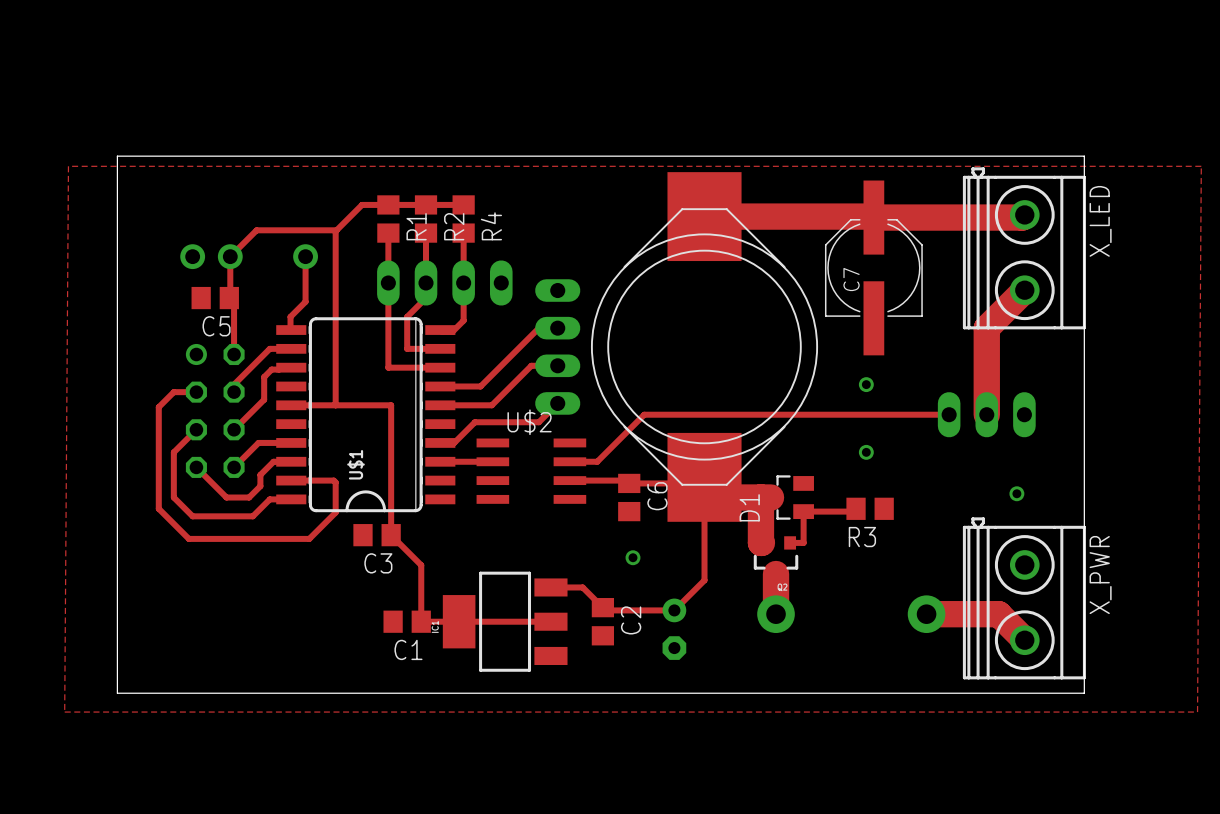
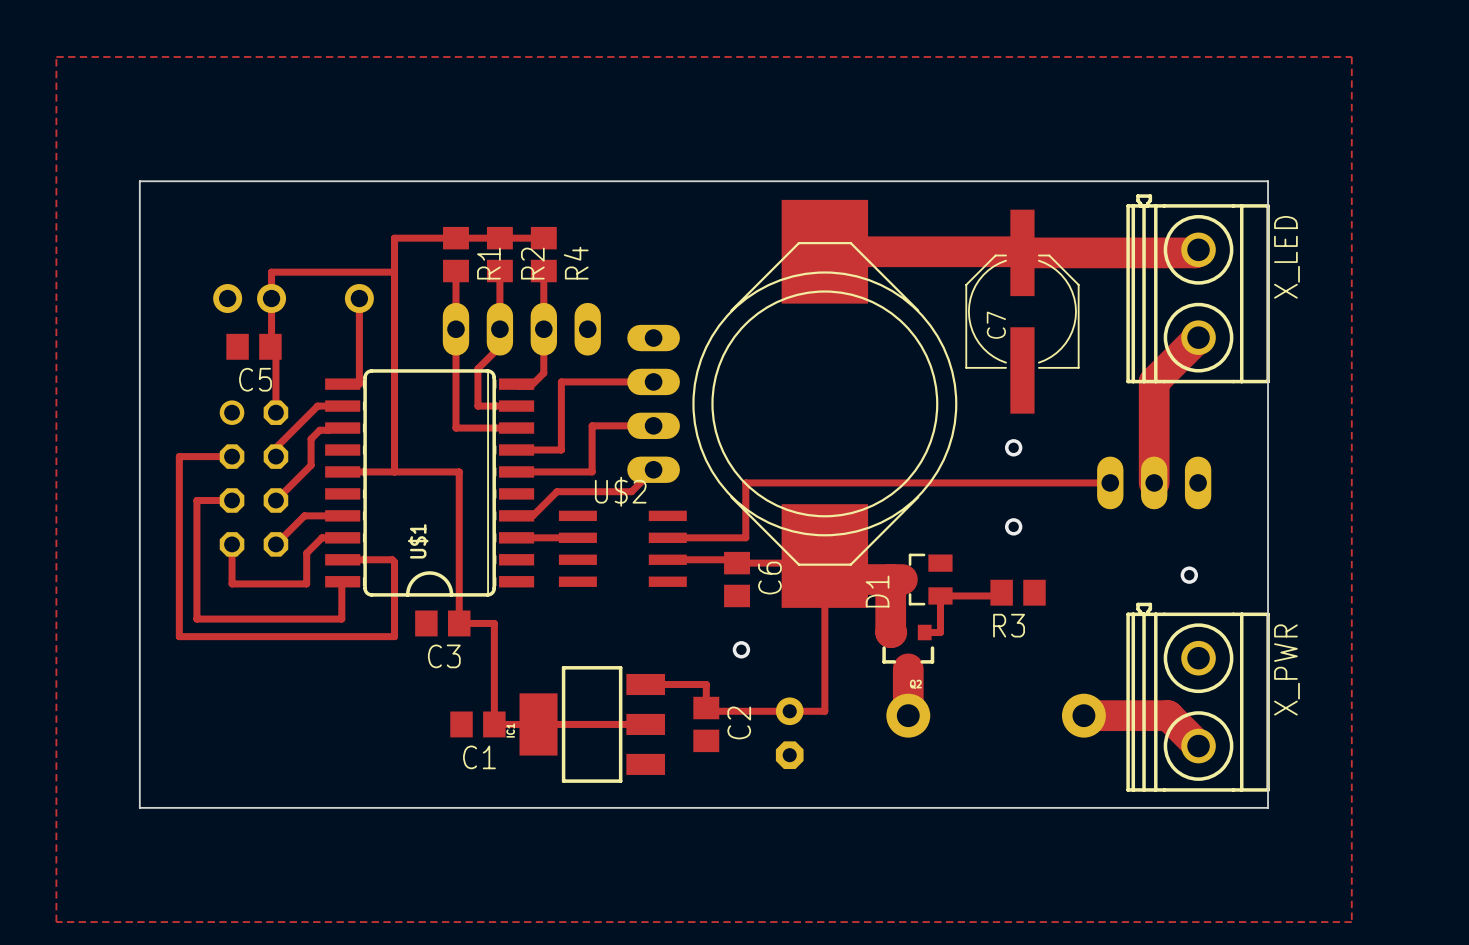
zone outline: (68, 166) (64, 712) (1197, 712) (1201, 166) (68, 166) -> (56, 56) (56, 922) (1351, 922) (1351, 56) (56, 56)
track: (362, 204) (335, 231) -> (425, 238) (394, 238) (394, 268)
track: (336, 230) (256, 230) (230, 256) -> (394, 272) (271, 272) (271, 298)
track: (305, 301) (290, 316) (291, 330) -> (359, 351) (359, 384) (342, 384)
track: (538, 328) (478, 386) -> (631, 381) (561, 381) (561, 450)
track: (531, 365) (491, 405) -> (622, 425) (592, 425) (592, 471) (576, 471)
track: (173, 392) (158, 407) (158, 508) (188, 538) (309, 538) (335, 512) -> (205, 456) (179, 456) (179, 636) (394, 636) (394, 597)
track: (644, 414) (597, 461) -> (754, 482) (745, 482) (745, 537) (699, 537)
track: (196, 429) (173, 452) (173, 497) (192, 516) (252, 516) (269, 499) (290, 499) -> (232, 500) (196, 500) (196, 619) (341, 619) (341, 581)
track: (196, 467) (226, 497) (249, 497) (260, 486) -> (232, 544) (232, 583) (306, 583) (306, 566)
track: (391, 535) (421, 565) -> (459, 623) (494, 623) (494, 658)
track: (704, 580) (674, 610) -> (824, 676) (824, 711) (789, 711)
track: (582, 587) (602, 607) -> (682, 684) (706, 684) (706, 708)

